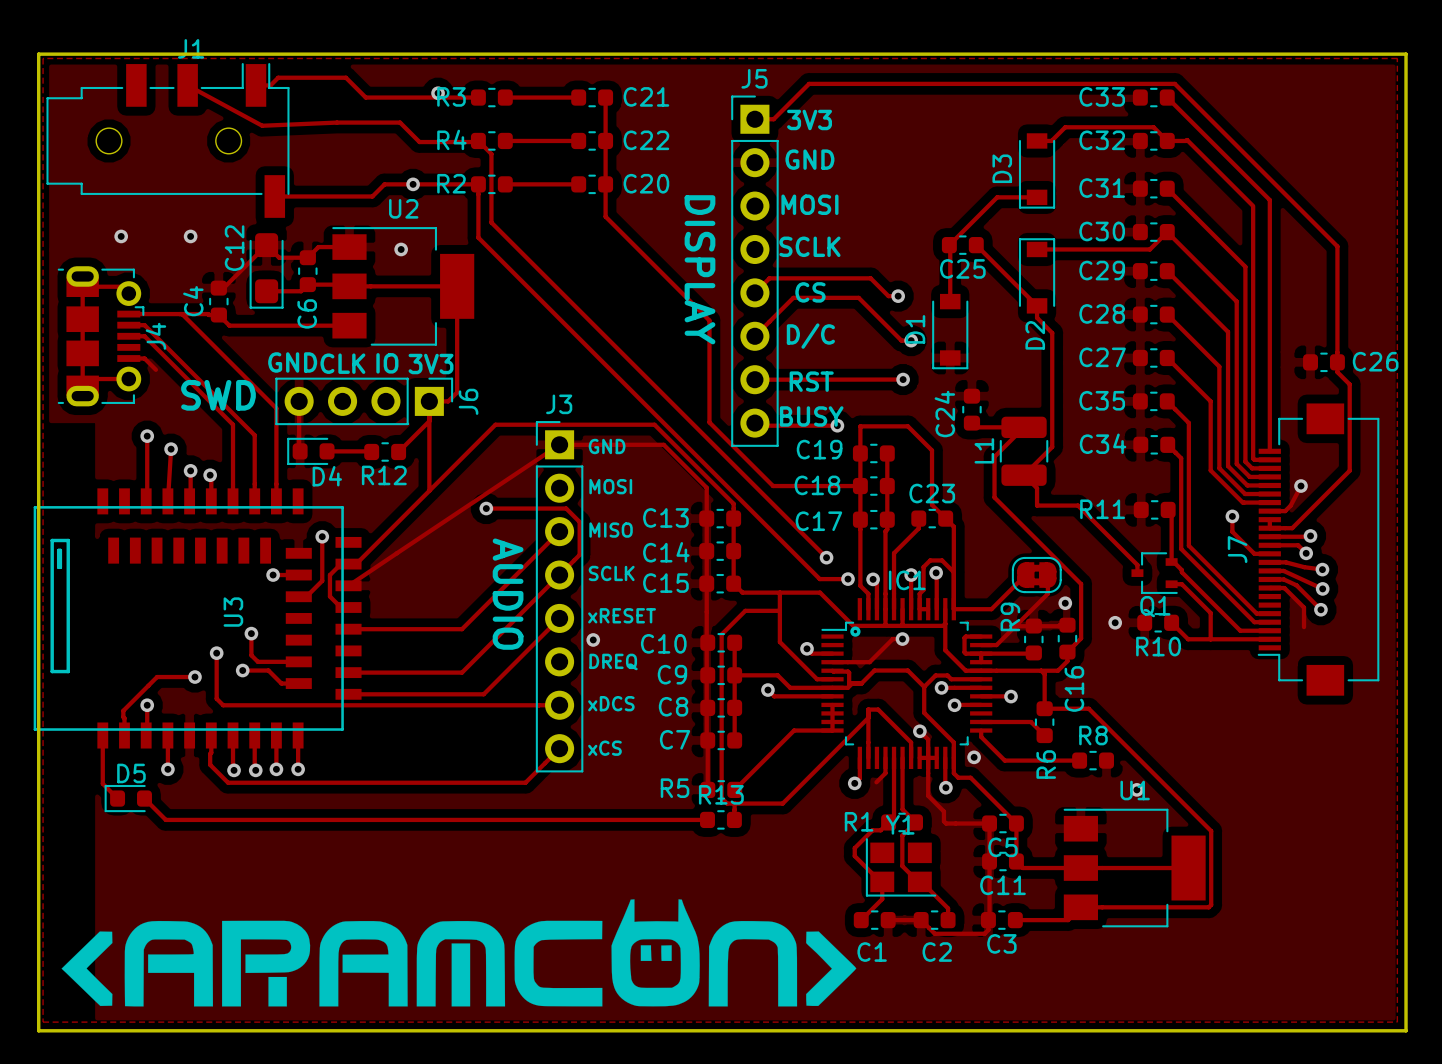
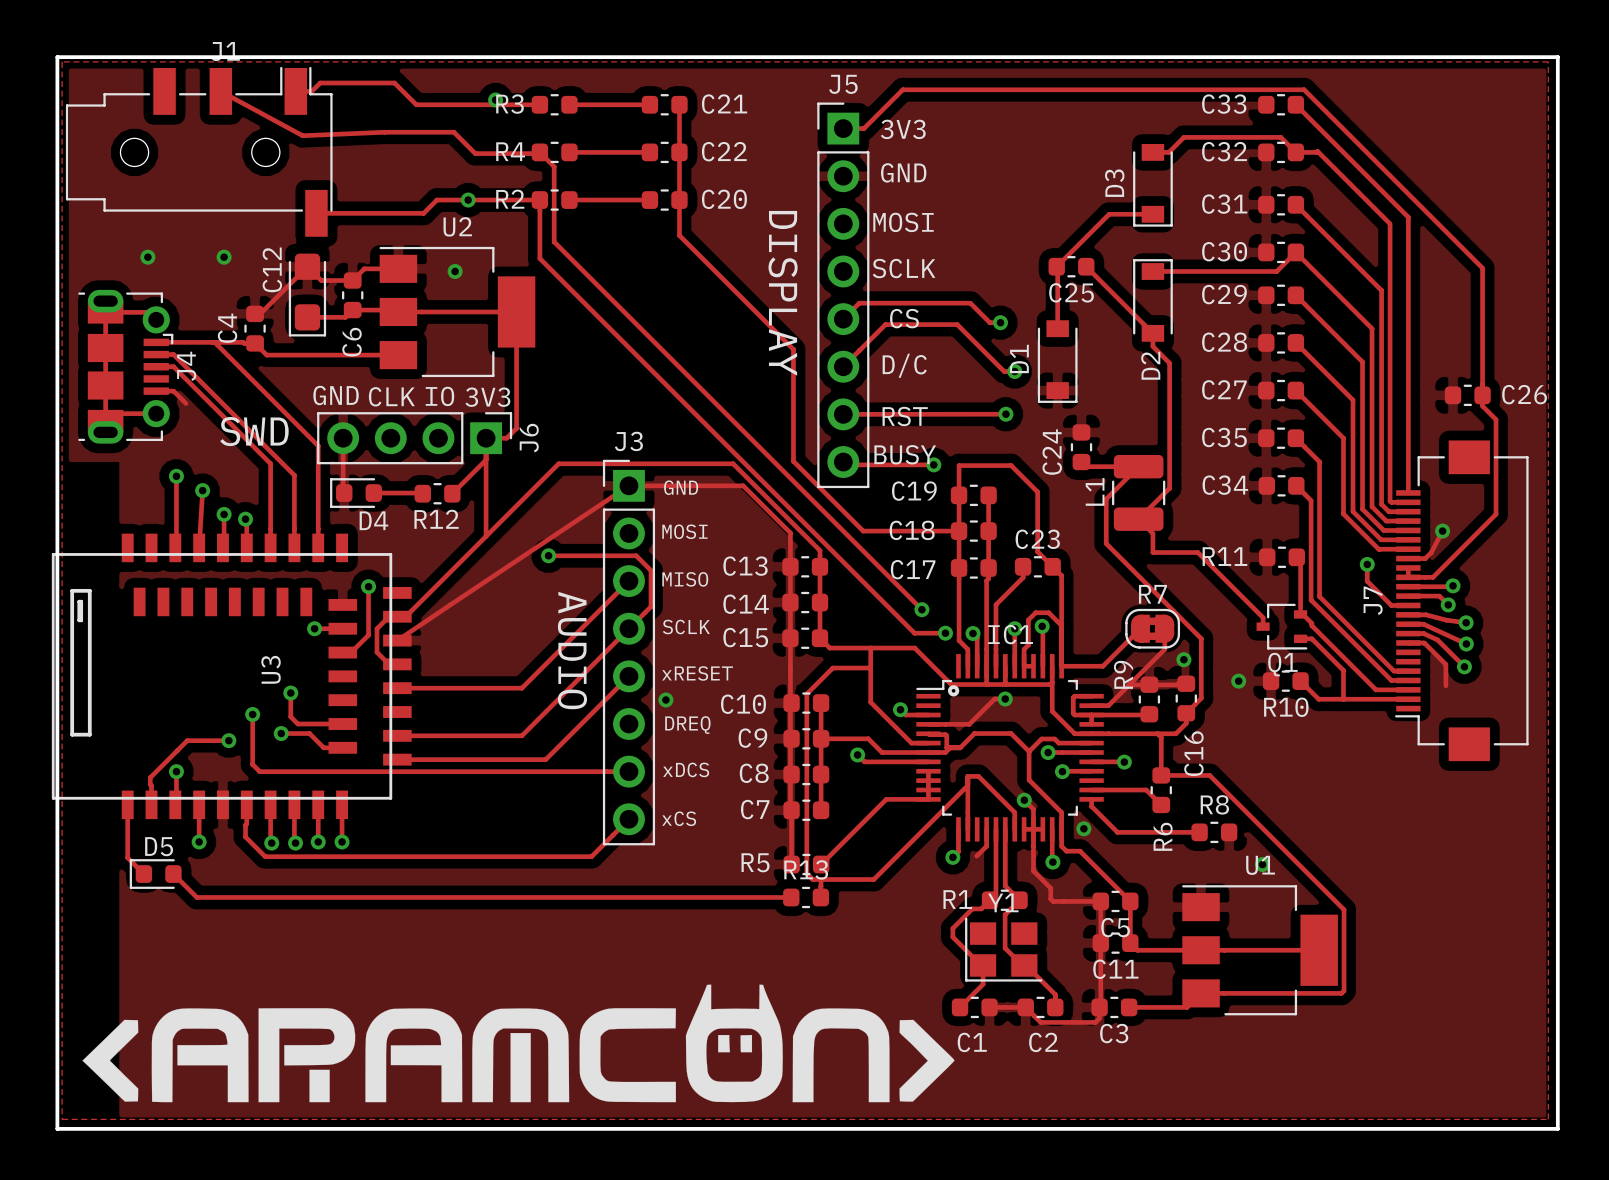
R7 name: none -> R7 (1152, 594)

